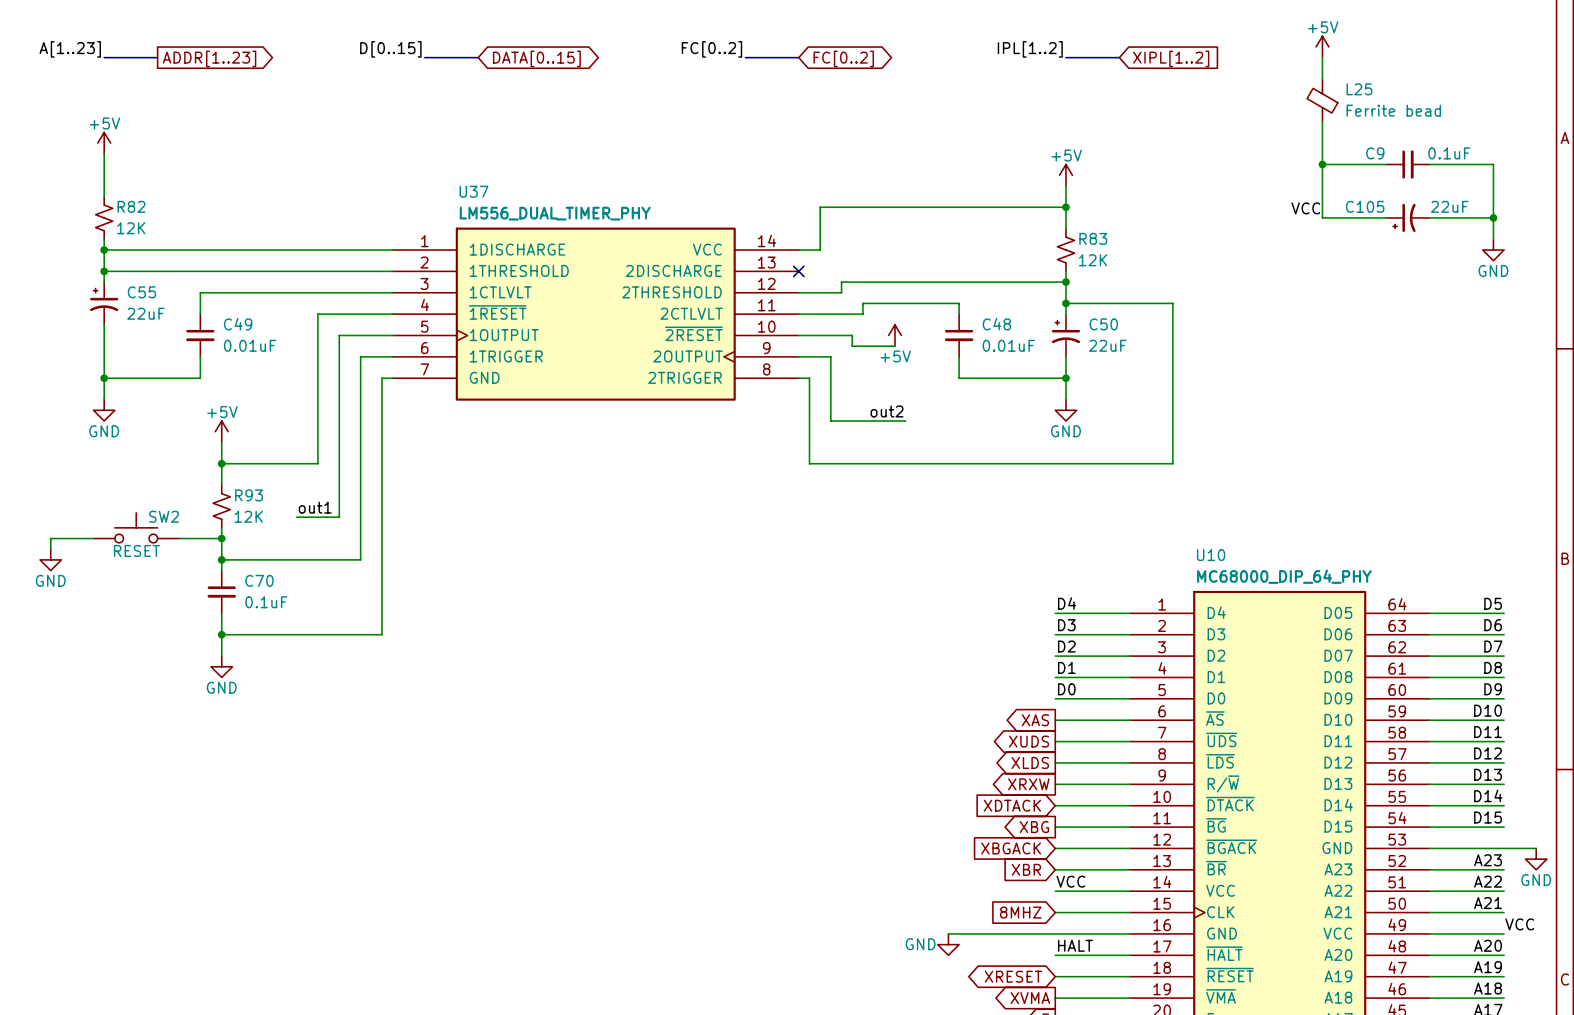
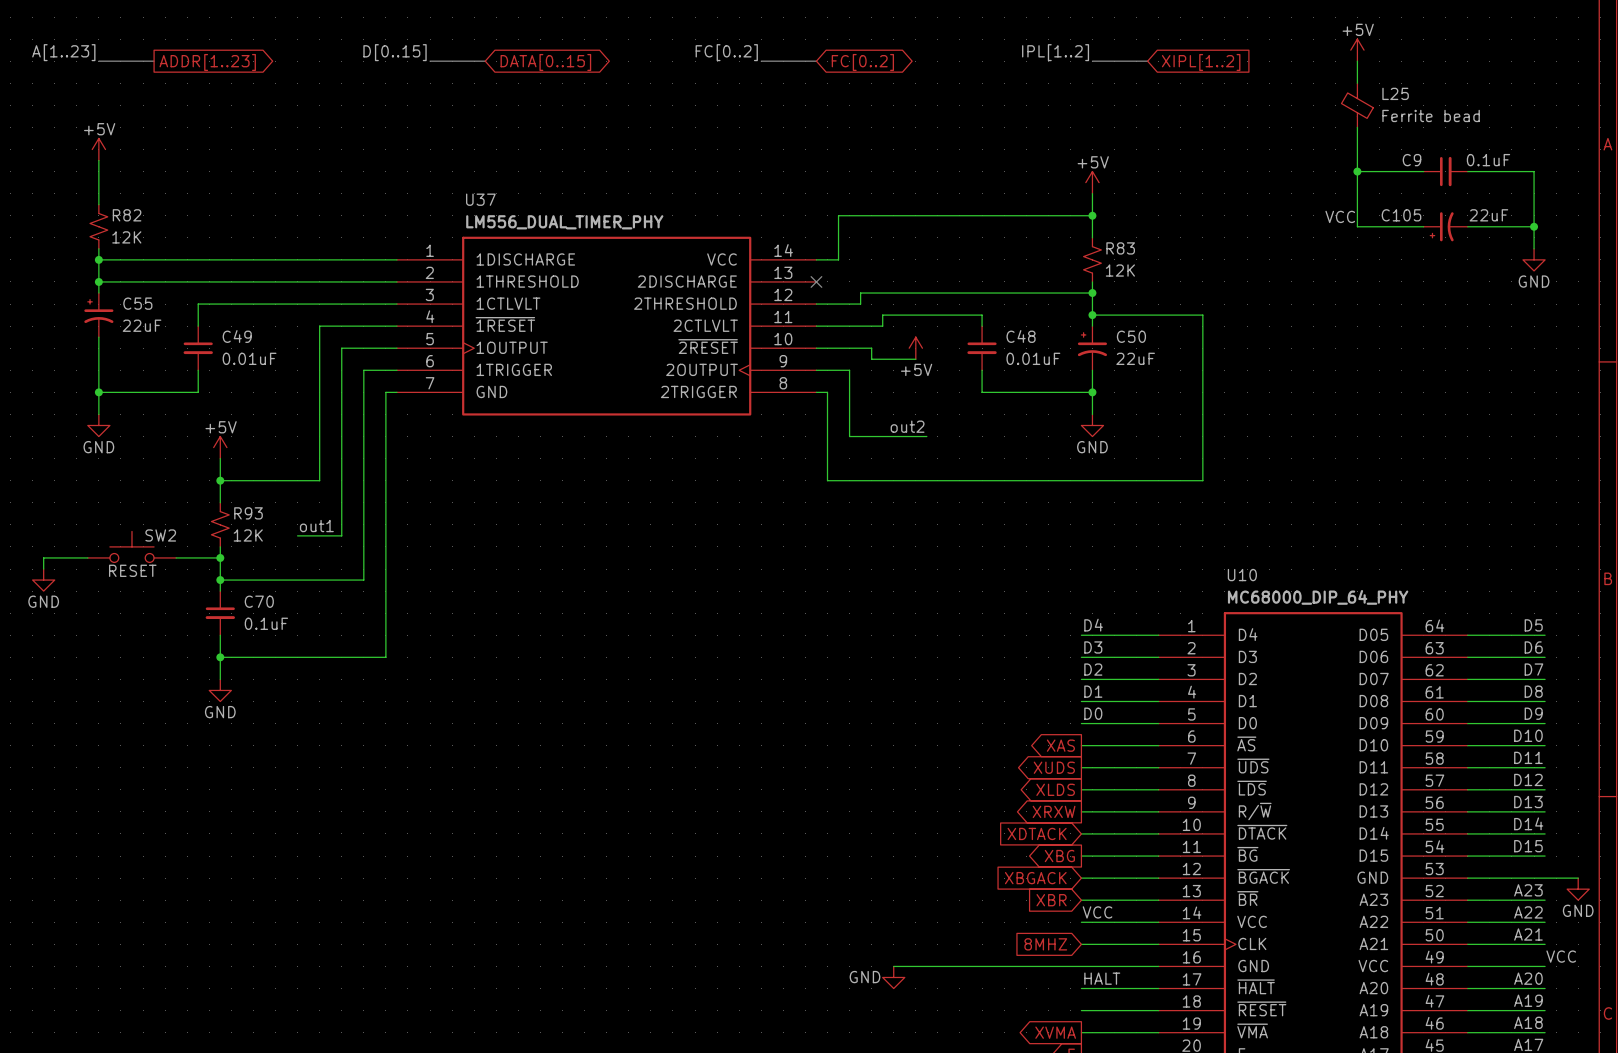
wire: none -> (893, 966) (971, 966)
power symbol position: GND (948, 944) -> GND (893, 977)
global label: XRESET (1013, 976) -> none

